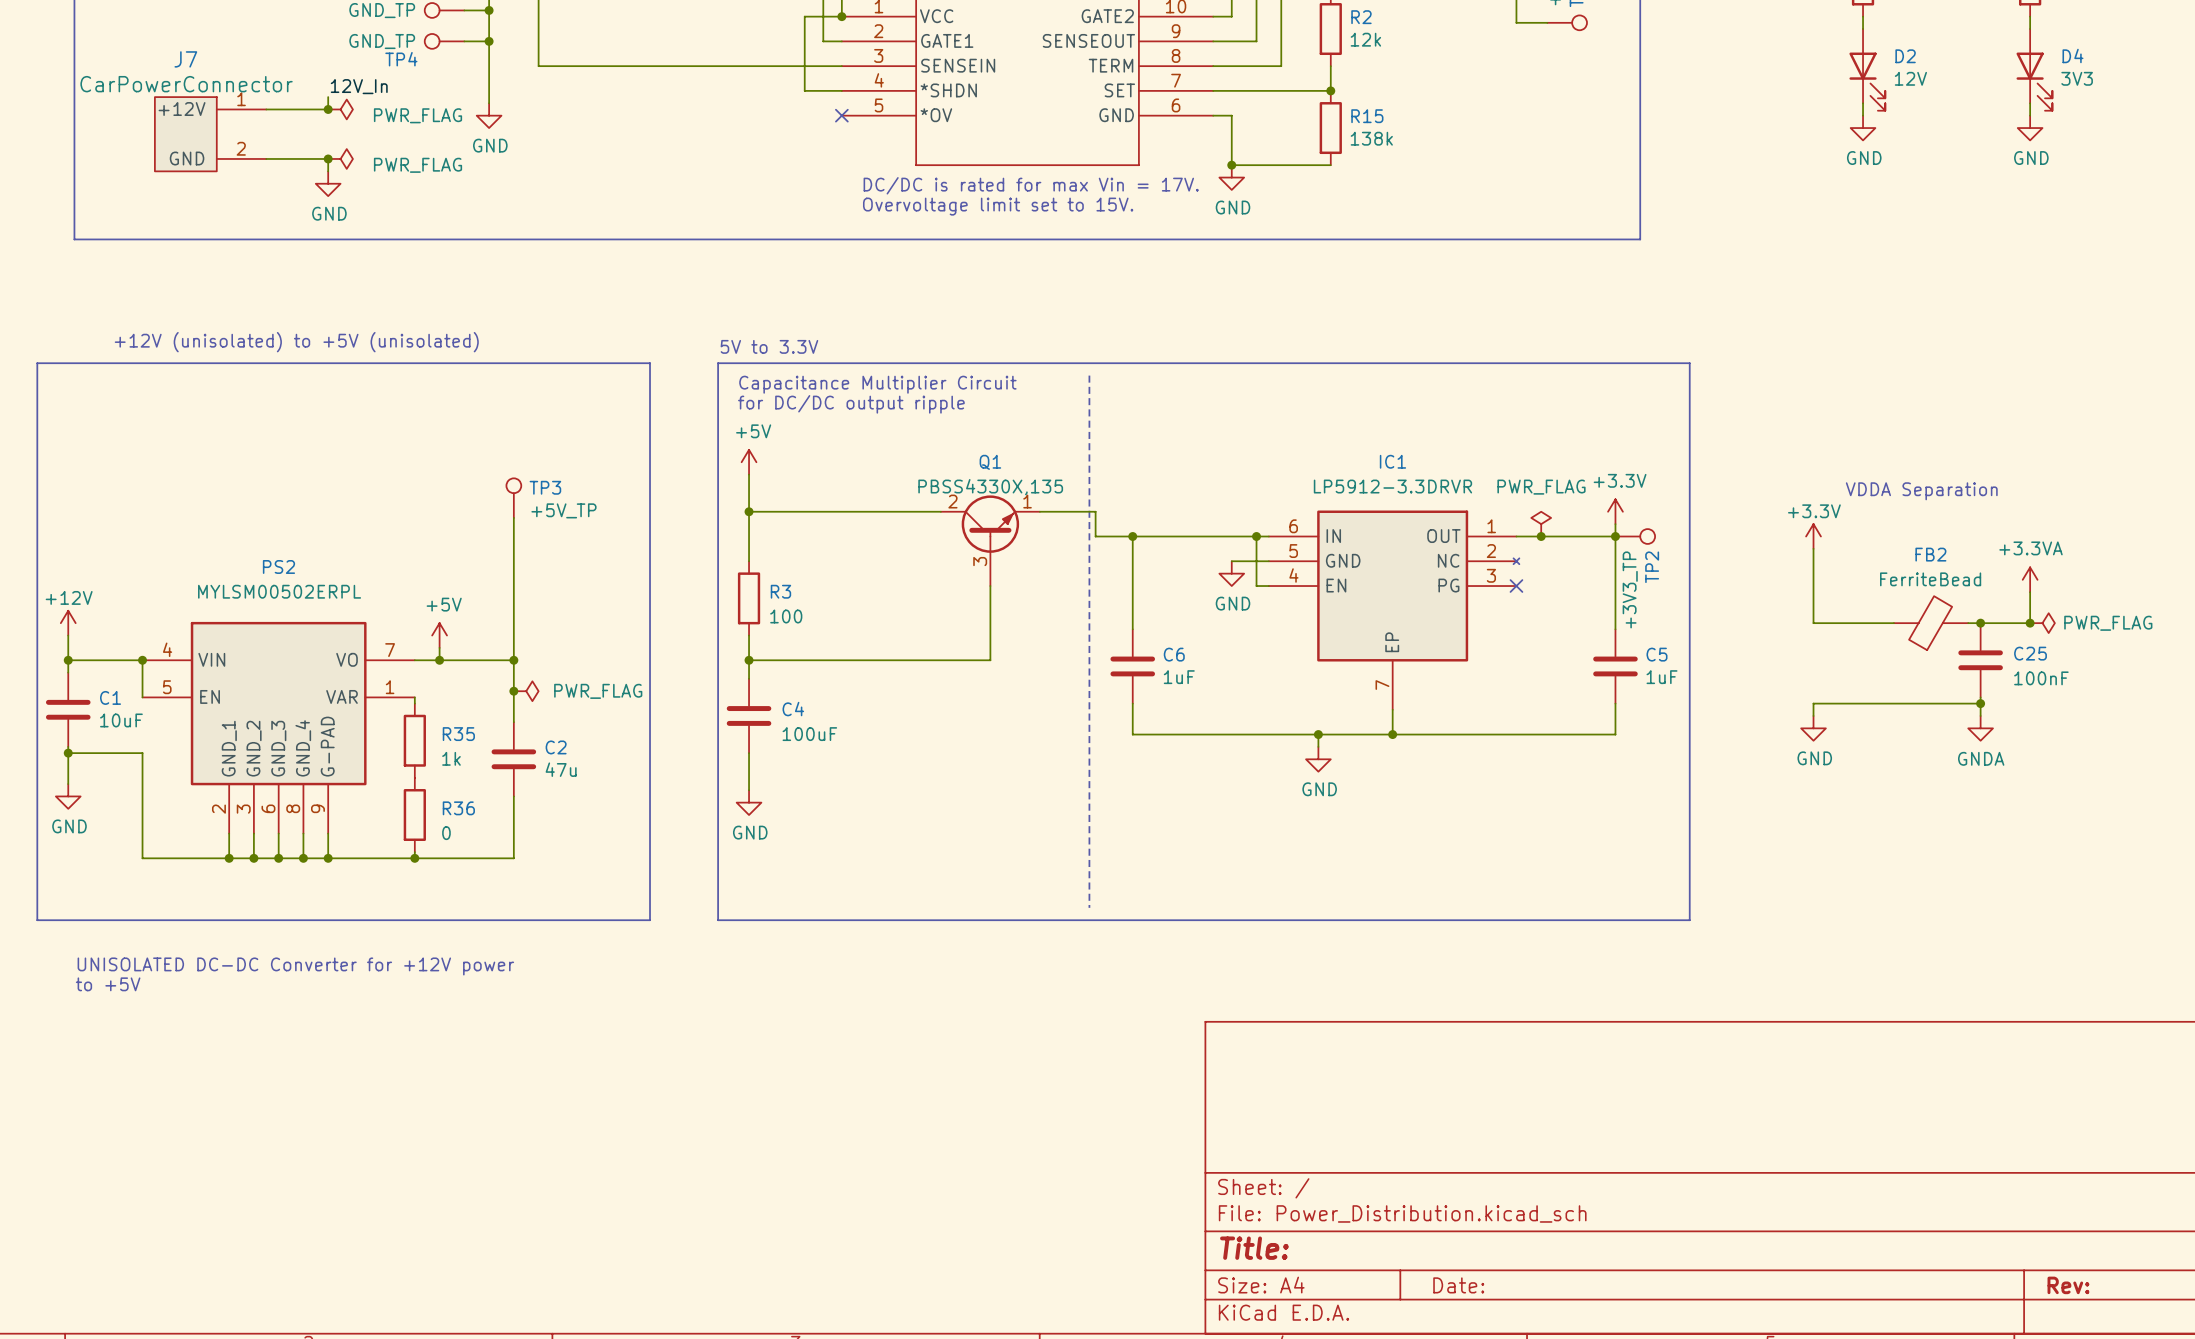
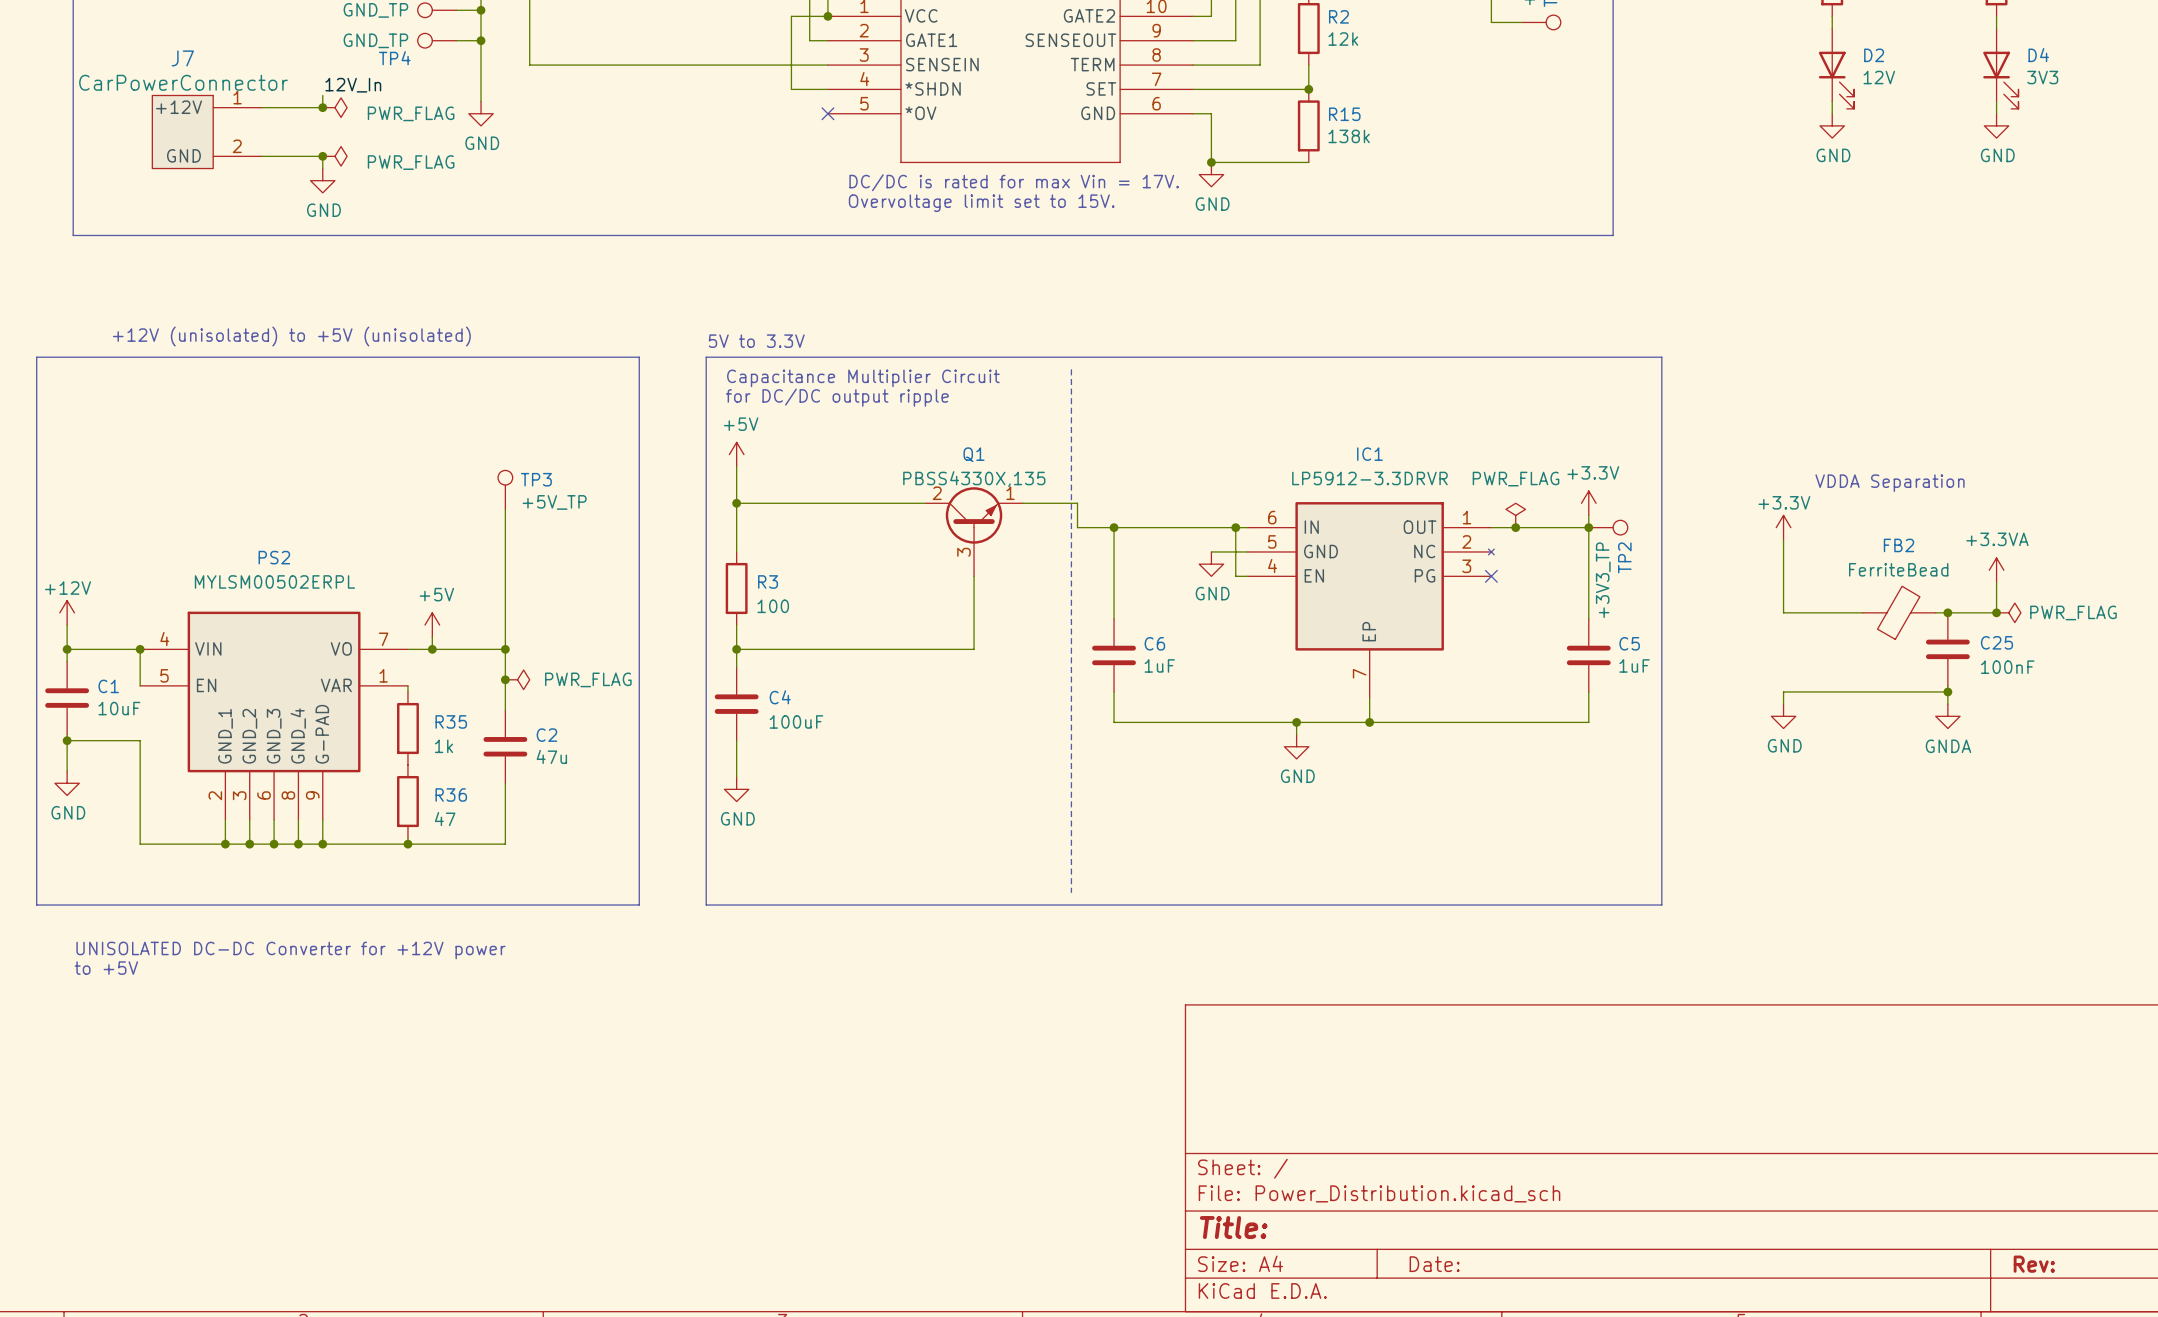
R36 value: 0 (446, 833) -> 47 (445, 819)

